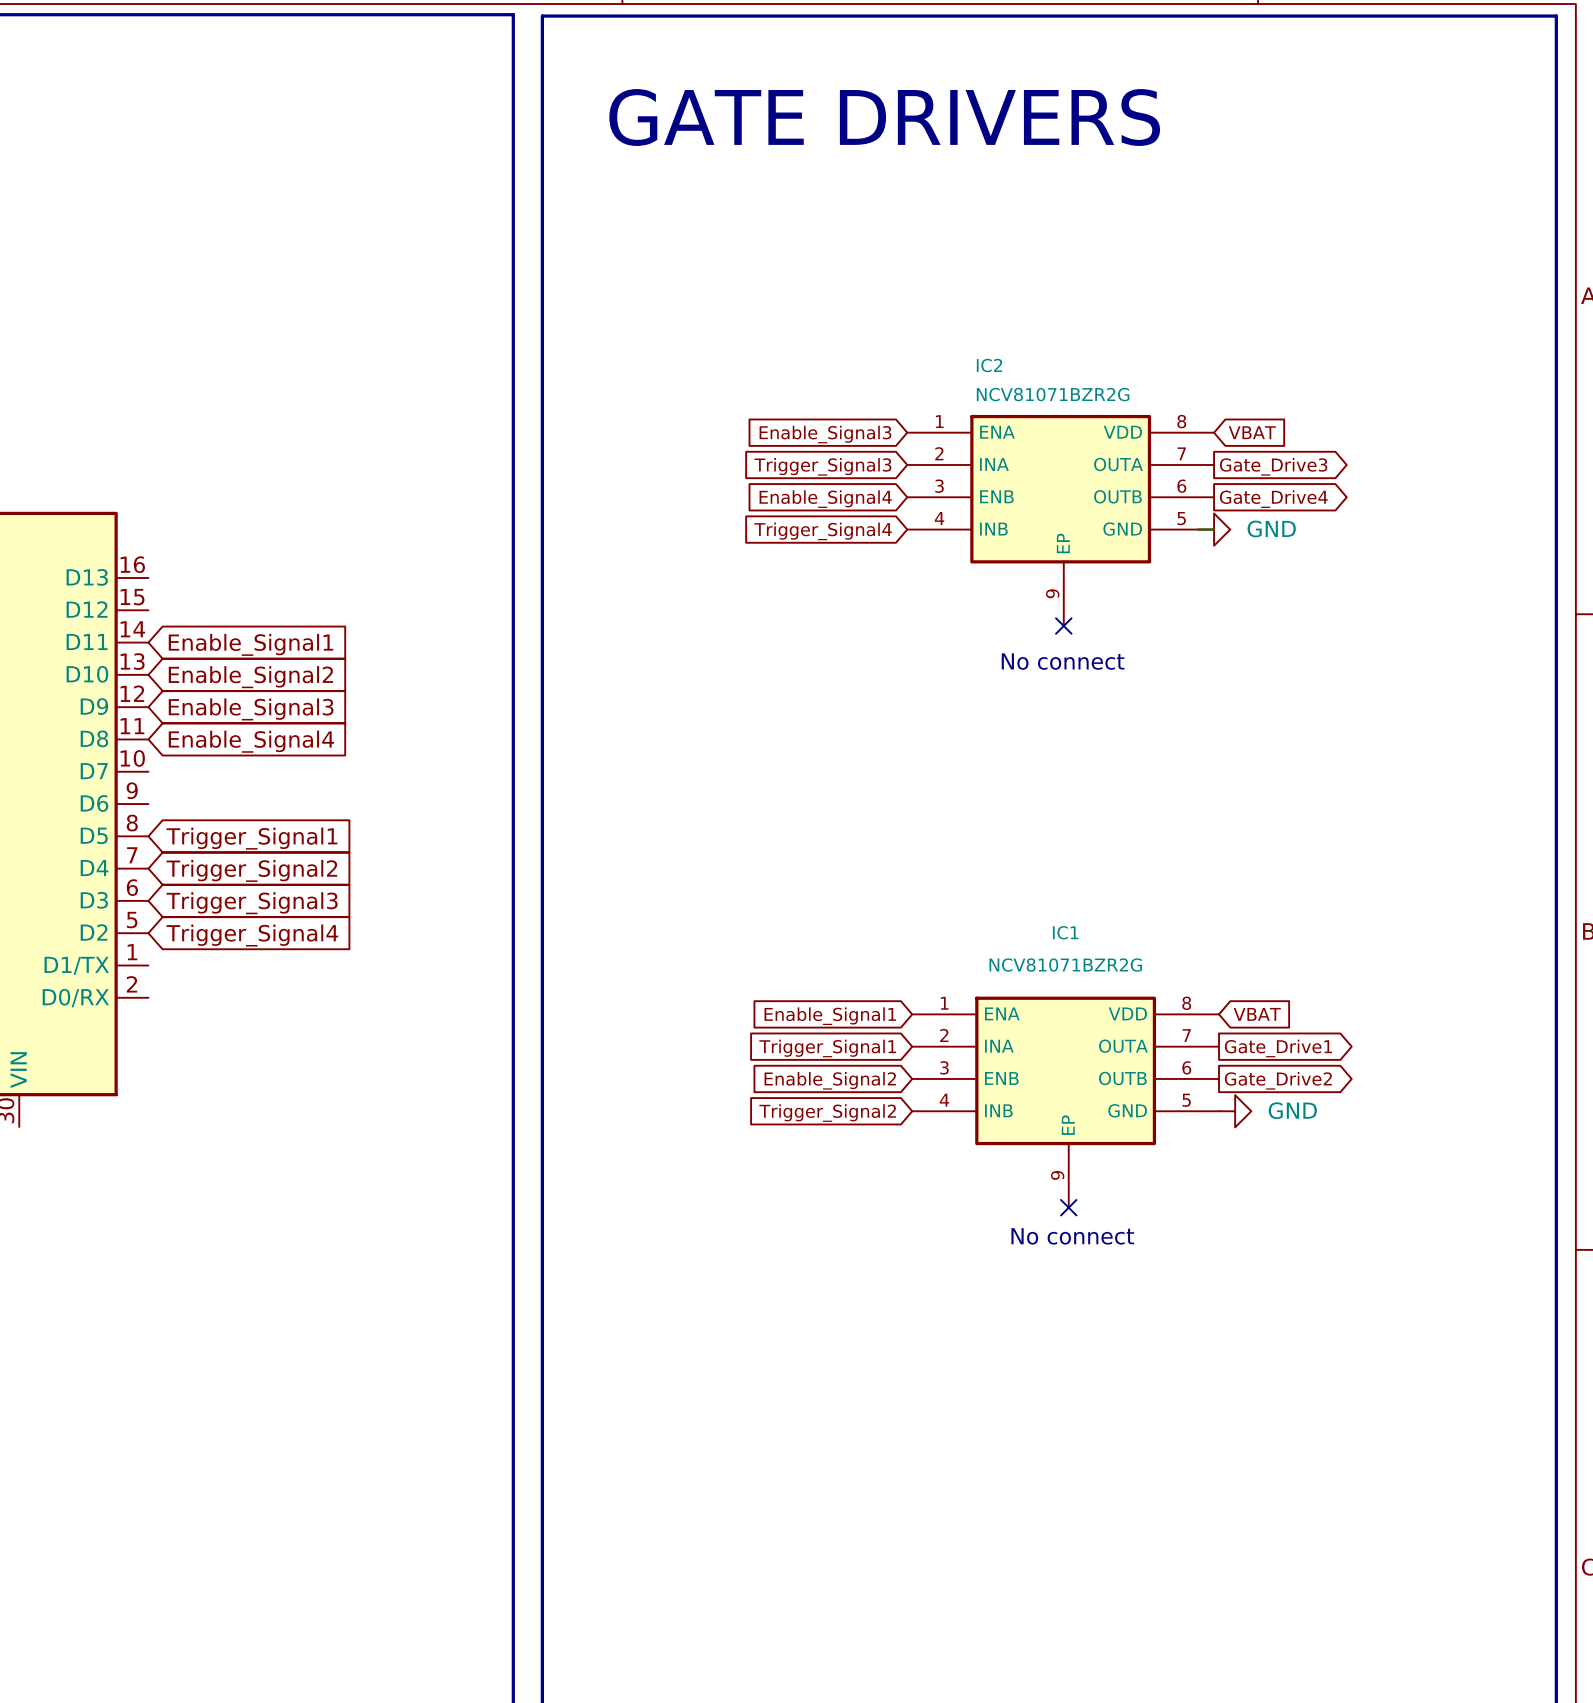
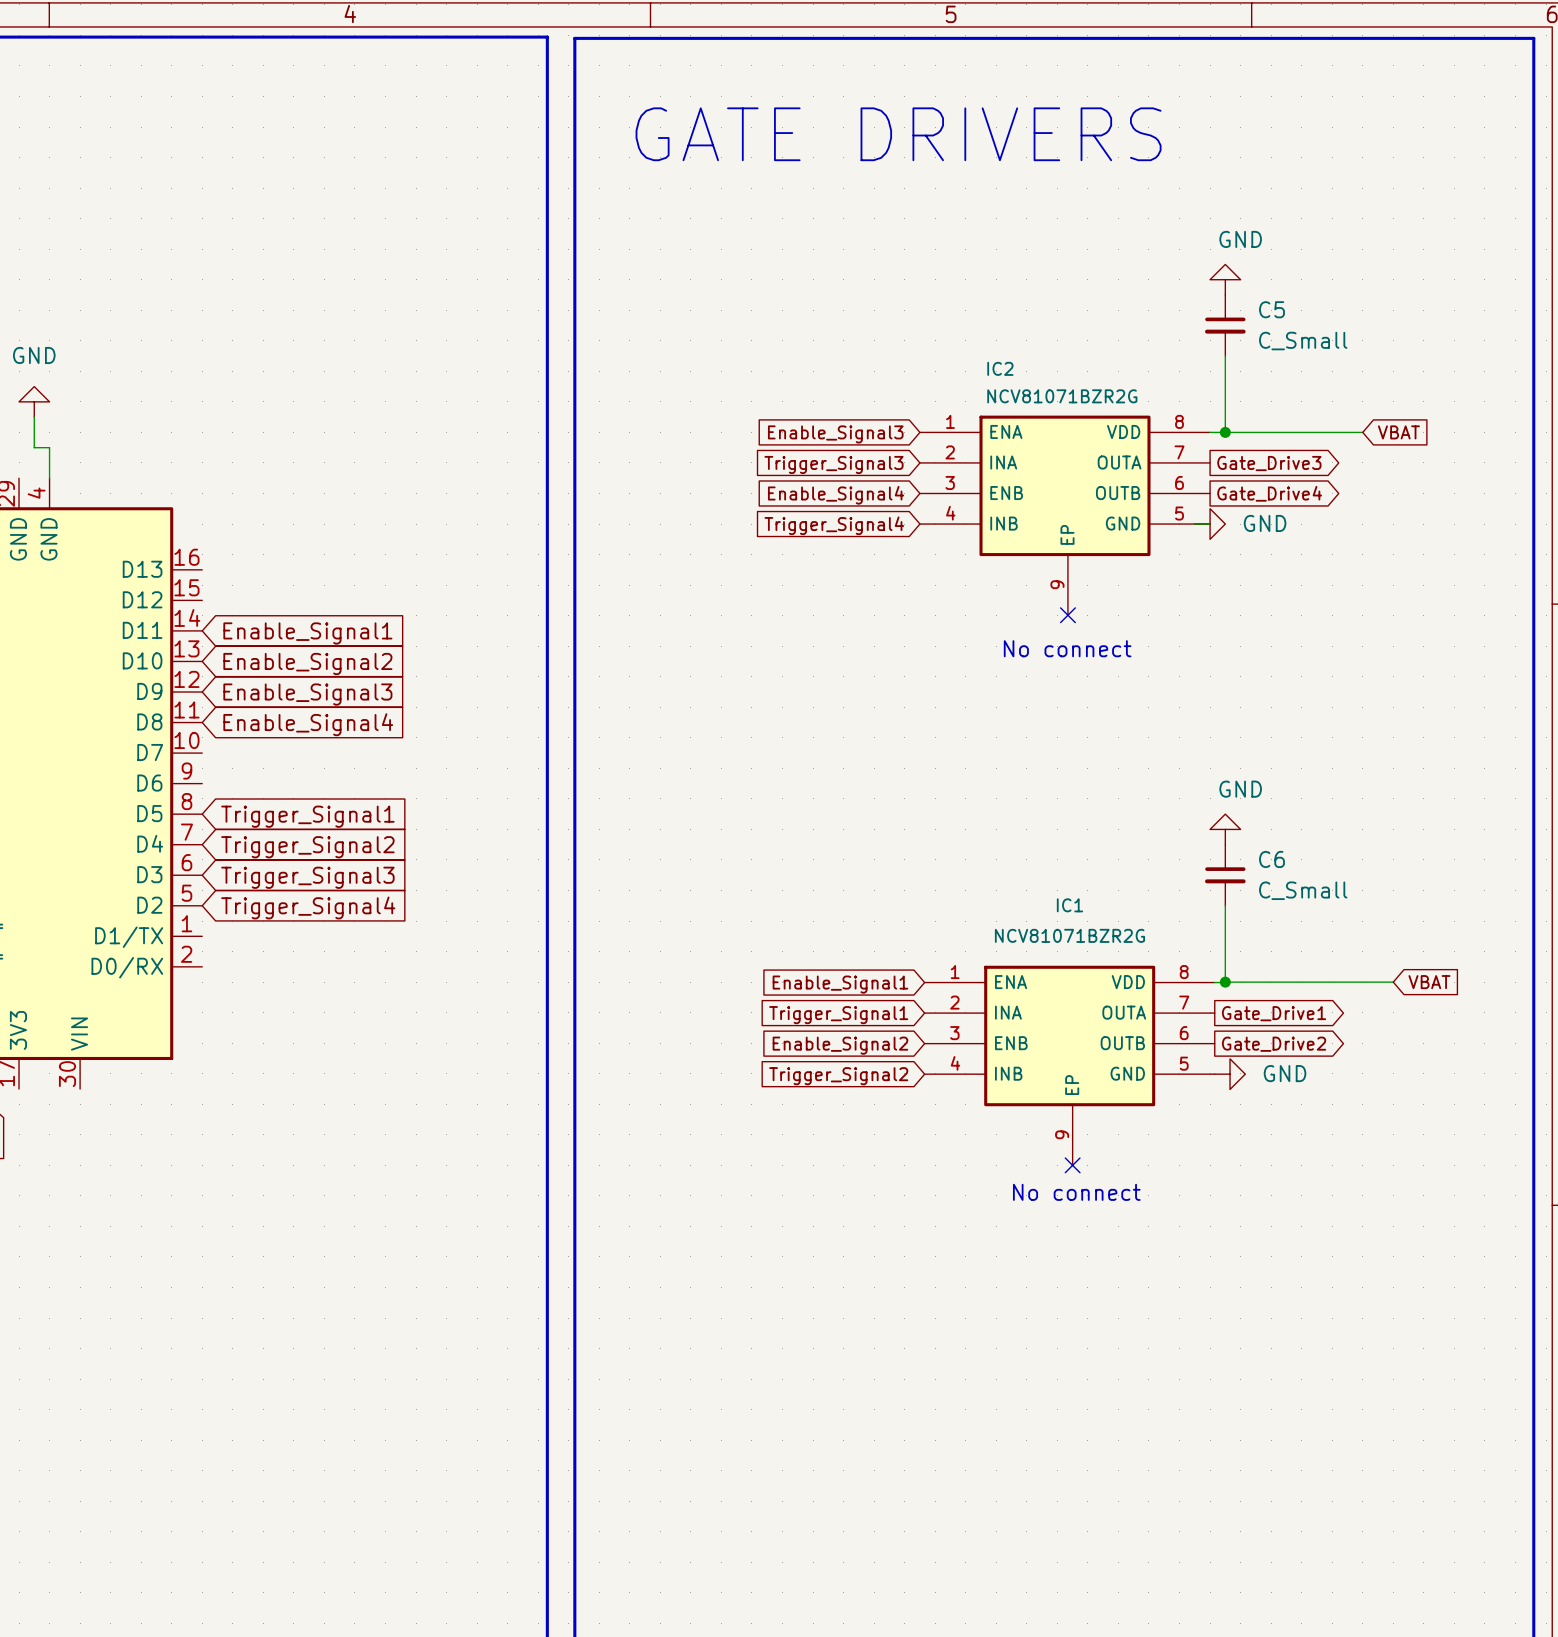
power symbol: none -> GND (1225, 279)
C5: none -> C_Small (1225, 325)
wire: none -> (1225, 356) (1225, 432)
wire: none -> (1210, 432) (1362, 432)
junction: none -> (1225, 432)
global label position: VBAT (1252, 432) -> VBAT (1398, 432)
power symbol: none -> GND (1225, 829)
C6: none -> C_Small (1225, 875)
wire: none -> (1225, 905) (1225, 982) (1214, 982)
wire: none -> (1225, 982) (1393, 982)
junction: none -> (1225, 982)
global label position: VBAT (1257, 1014) -> VBAT (1429, 982)

